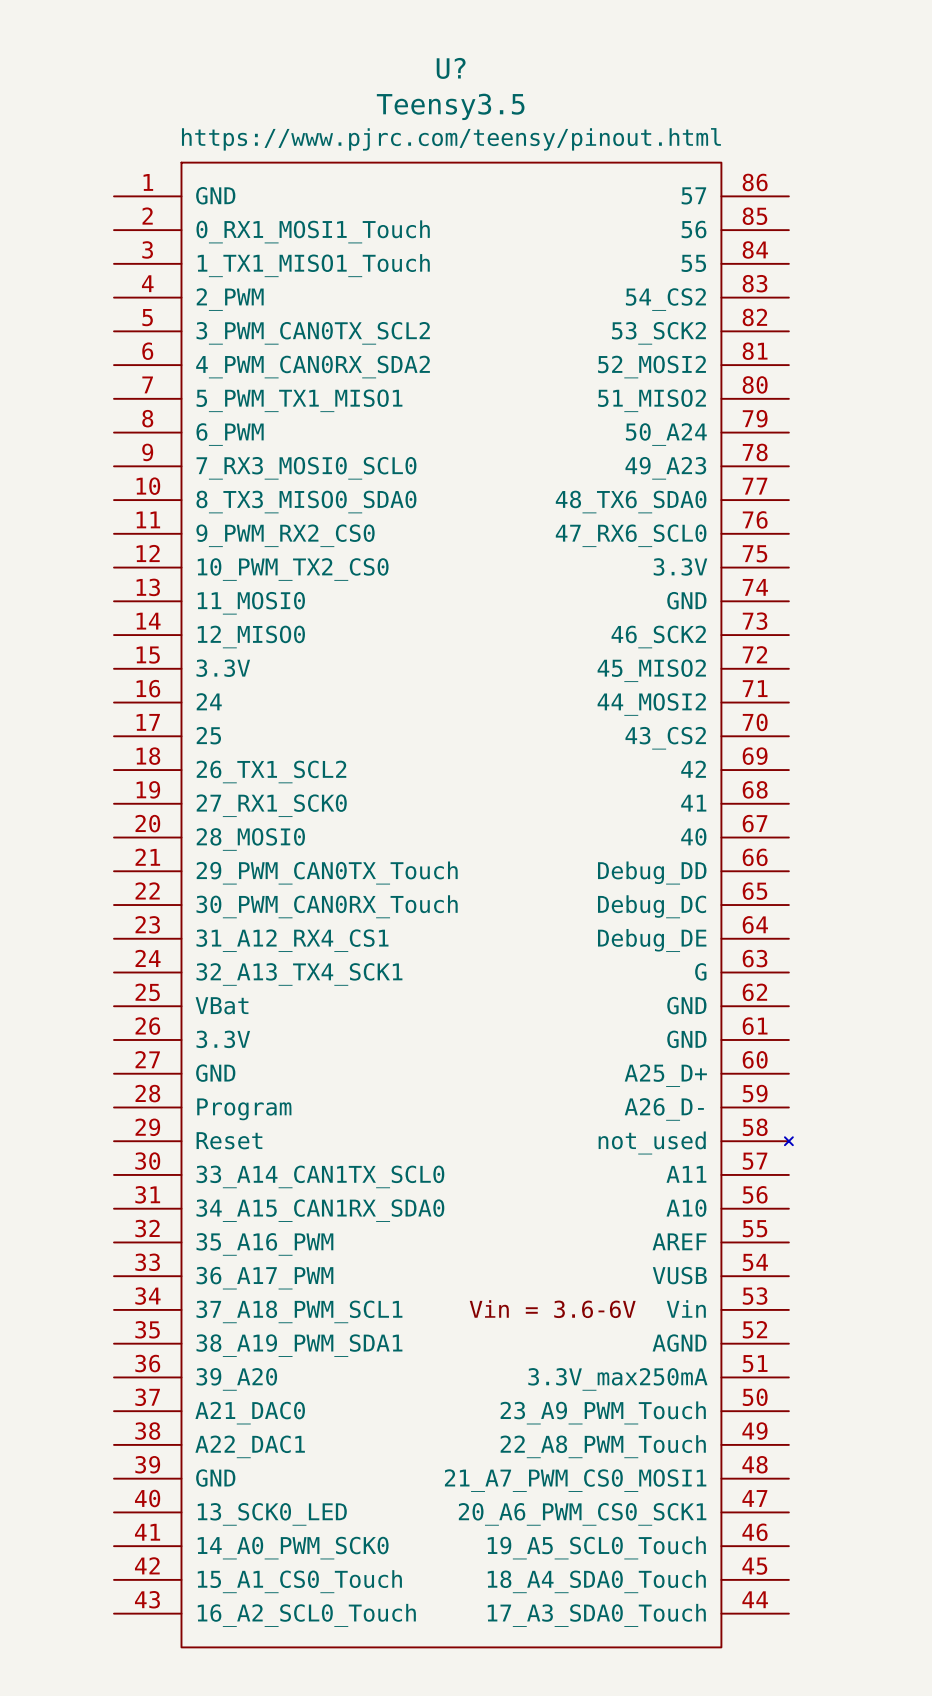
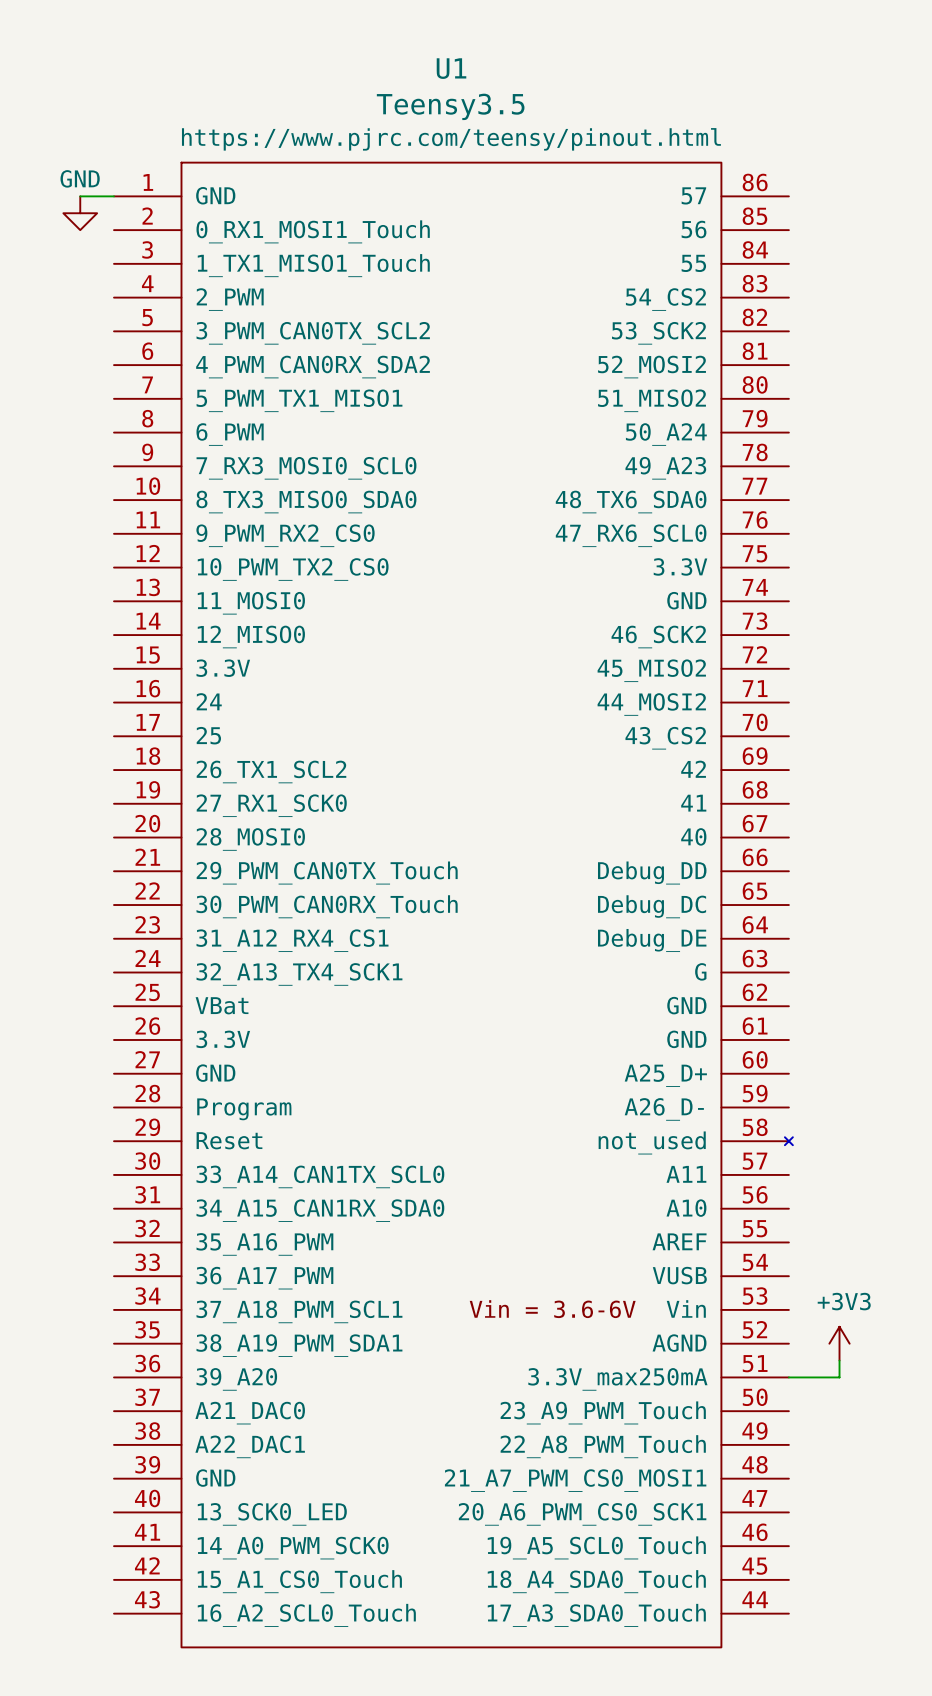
U? name: U? (451, 68) -> U1 (451, 68)
wire: none -> (80, 196) (114, 196)
power symbol: none -> GND (80, 213)
power symbol: none -> +3V3 (839, 1343)
wire: none -> (839, 1360) (839, 1377) (788, 1377)

